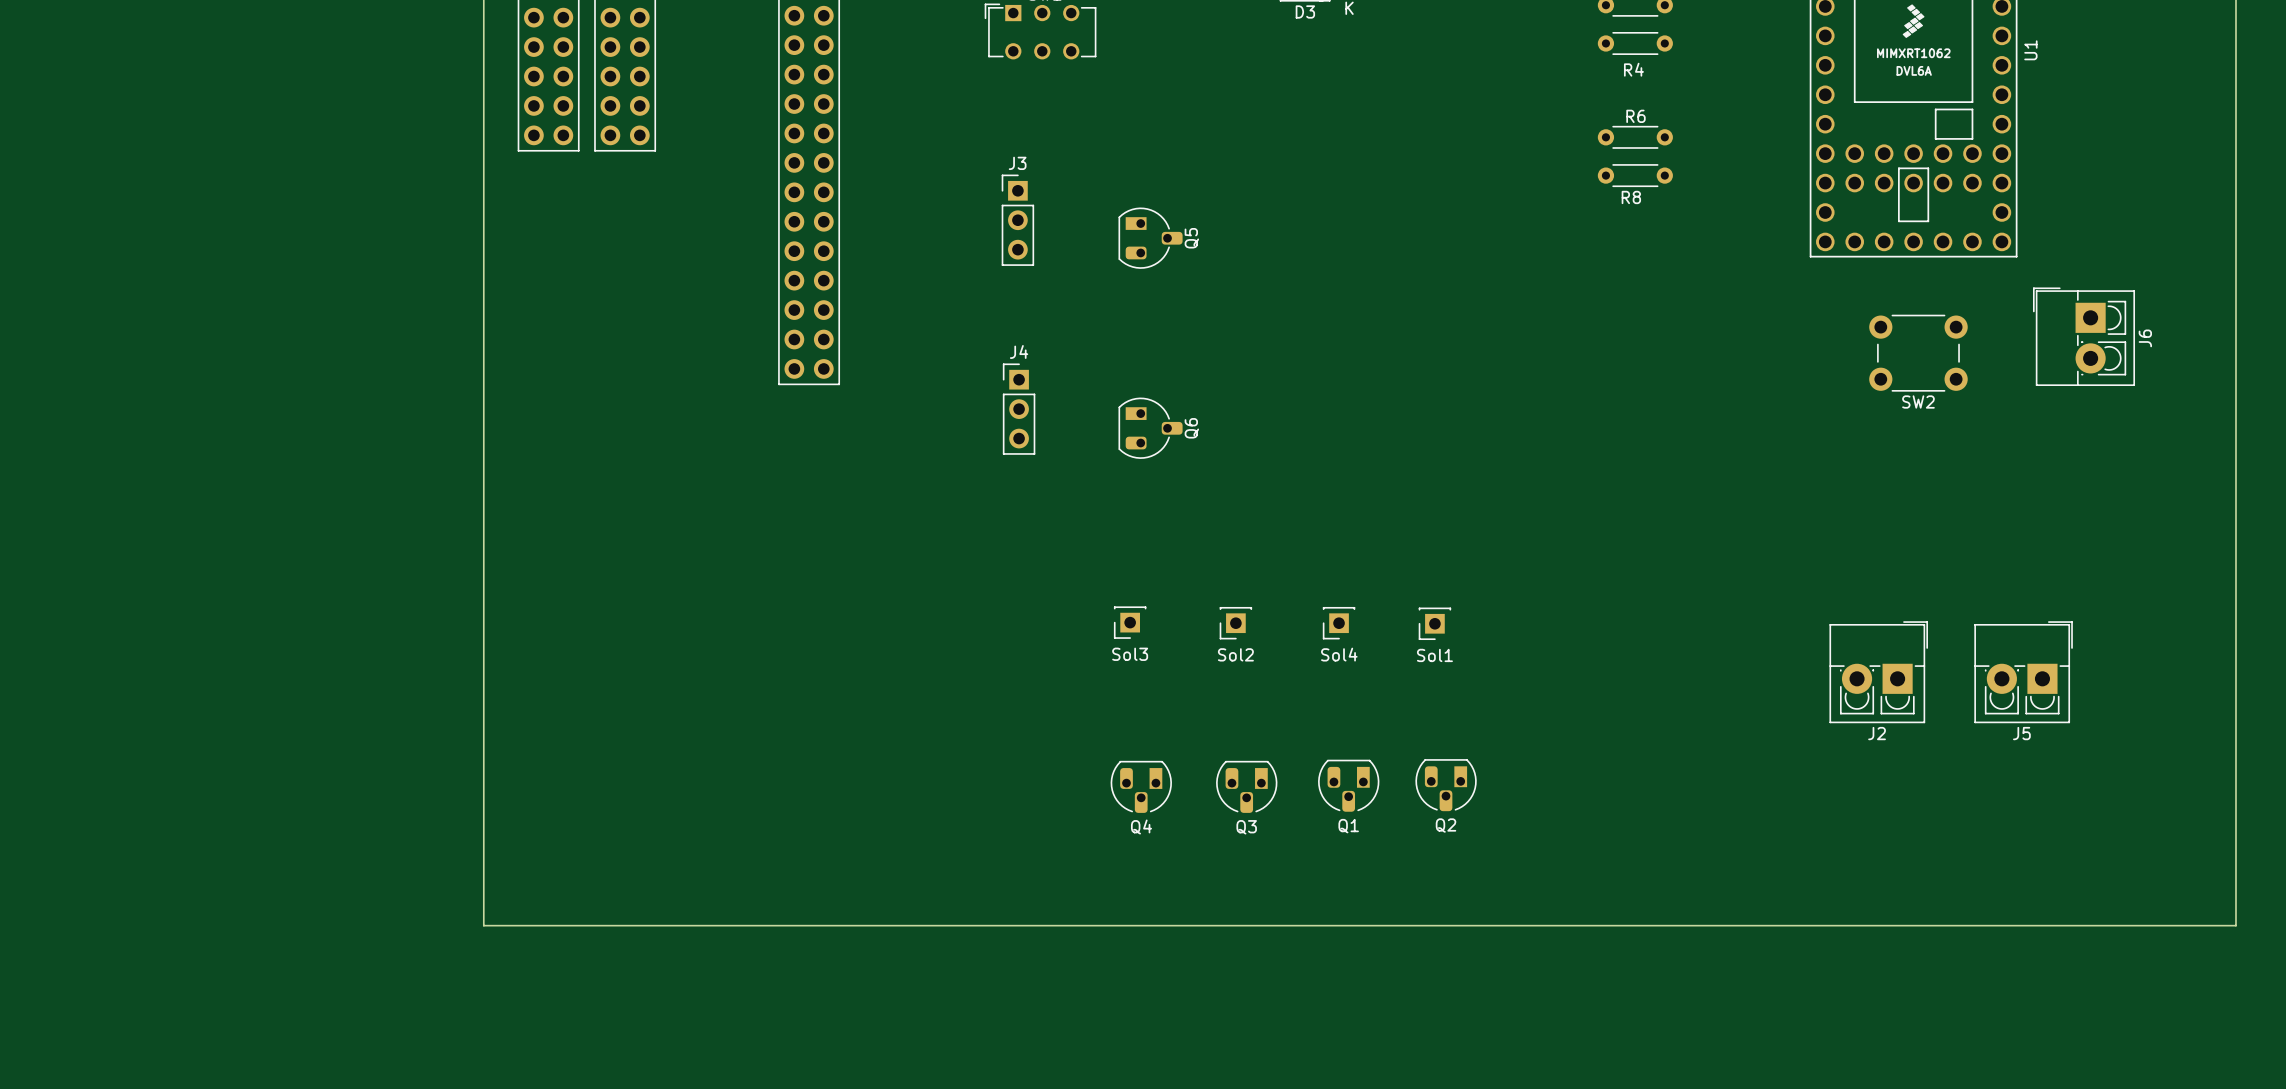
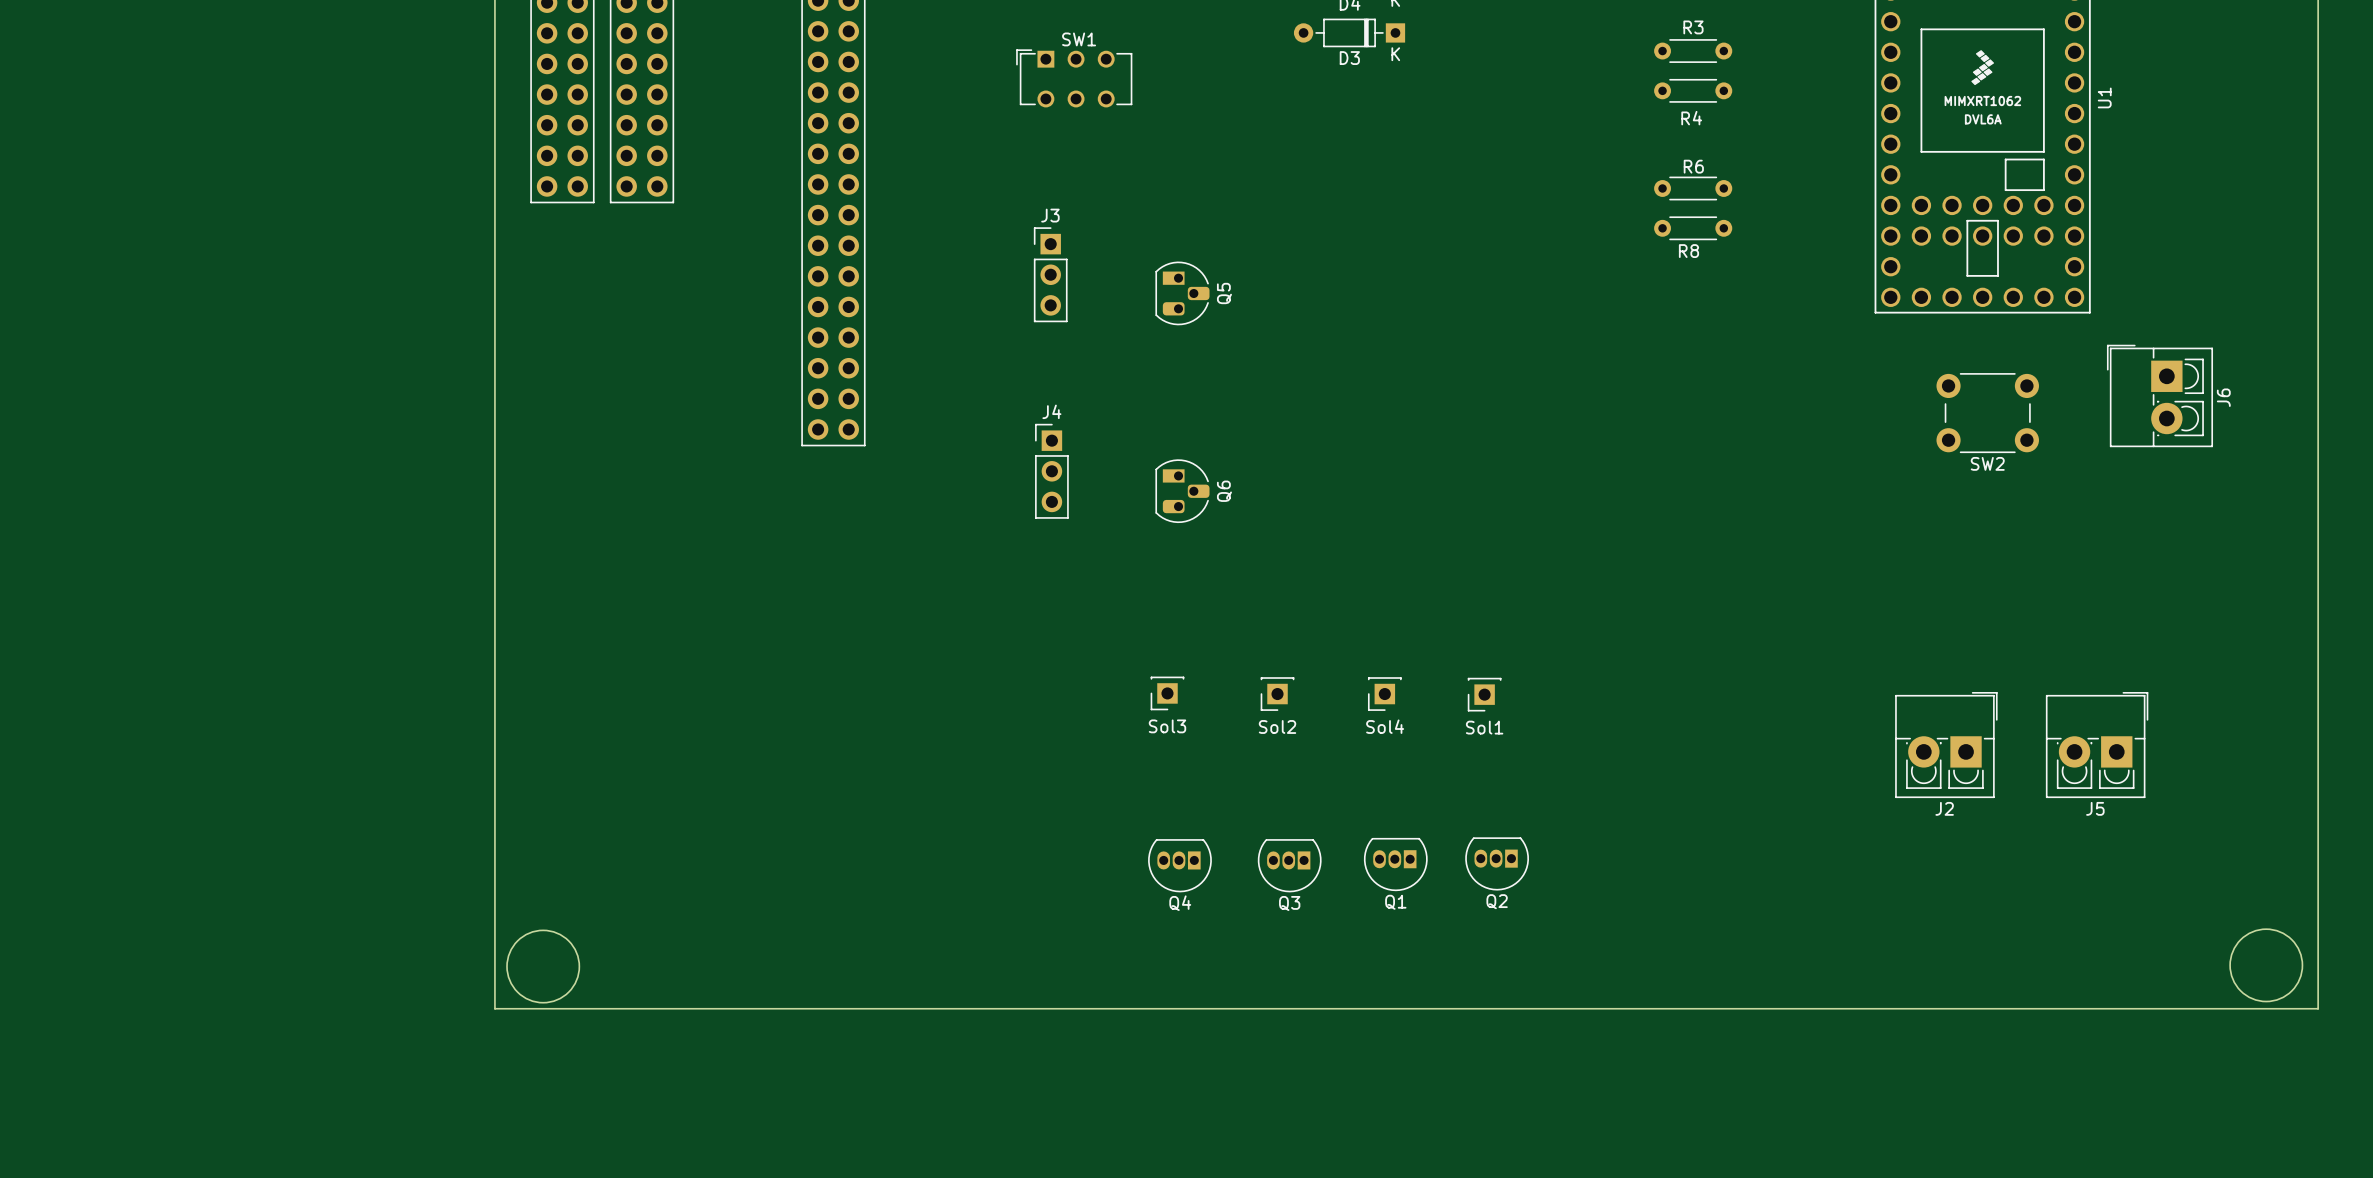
Q5 footprint: [1118, 207, 1183, 269] -> [1155, 261, 1210, 326]
Q6 footprint: [1118, 397, 1183, 459] -> [1155, 459, 1210, 523]
Q1 footprint: [1318, 759, 1380, 812] -> [1364, 838, 1428, 892]
Q2 footprint: [1415, 759, 1477, 812] -> [1465, 837, 1529, 891]
Q4 footprint: [1110, 760, 1172, 813] -> [1148, 839, 1212, 893]
Q3 footprint: [1216, 760, 1278, 813] -> [1257, 839, 1322, 893]
round board edge: none -> [2229, 928, 2304, 1003]
round board edge: none -> [506, 929, 580, 1004]

